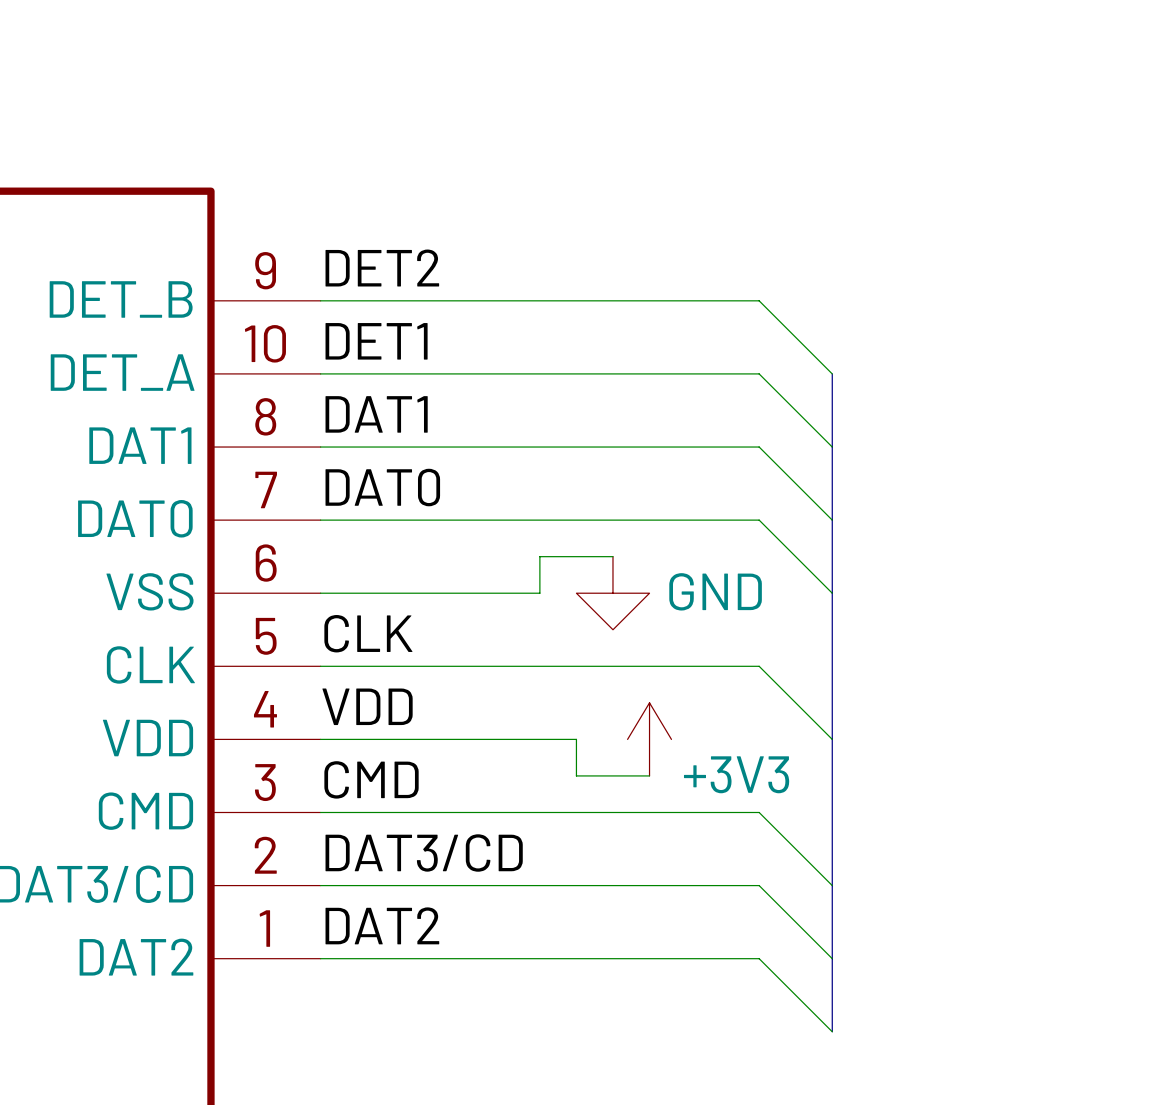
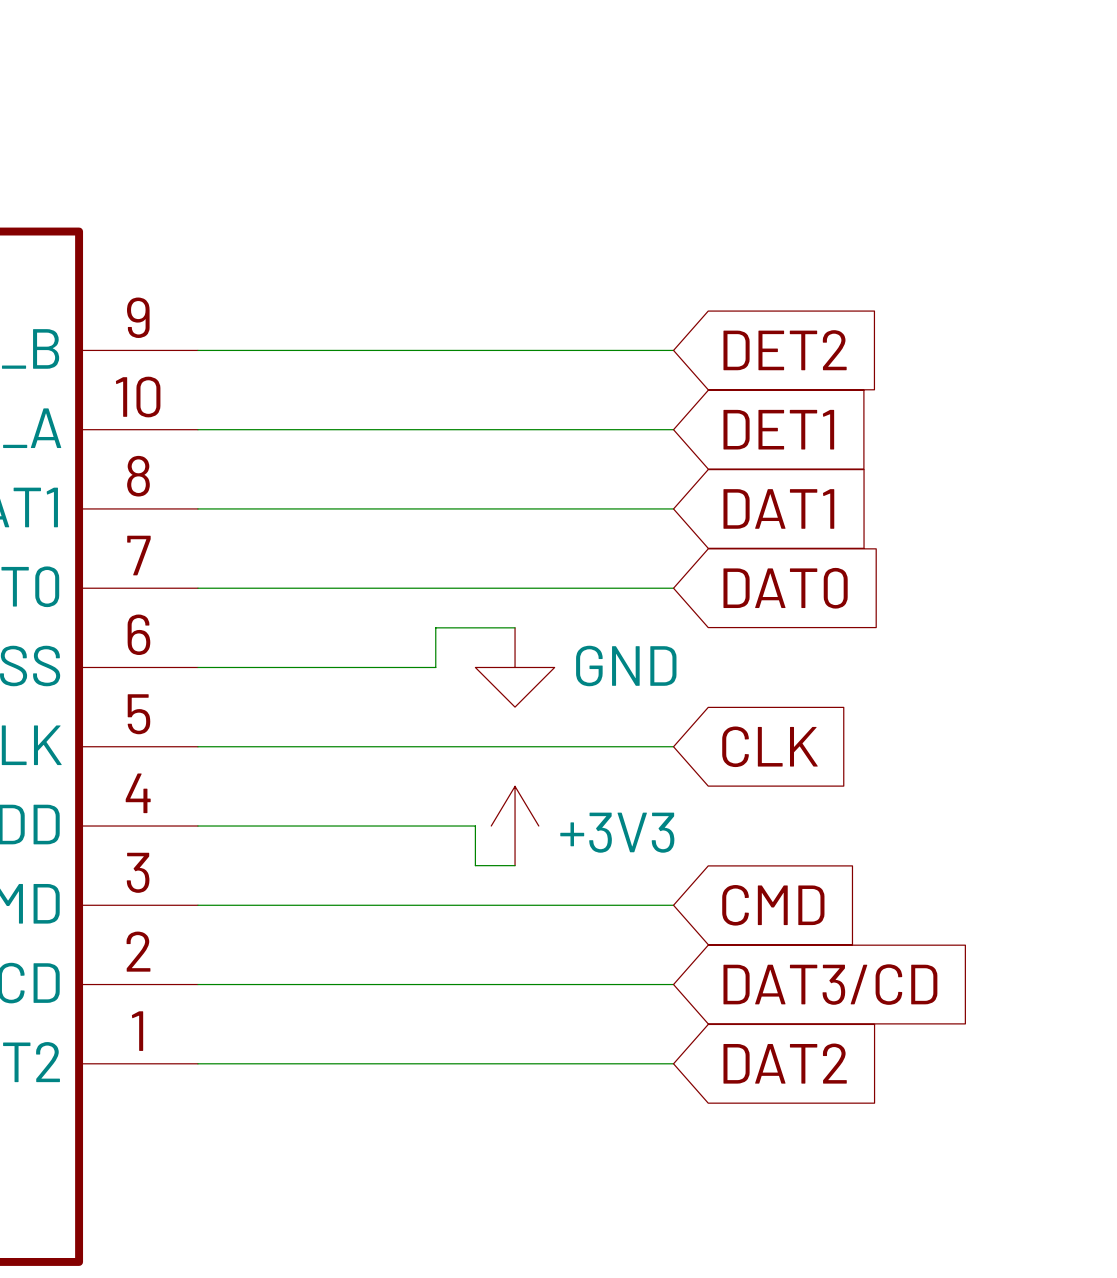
label: DET2 (382, 268) -> none
wire: (759, 300) (832, 373) -> none
global label: none -> DET2 (785, 350)
label: DET1 (376, 341) -> none
wire: (759, 373) (832, 447) -> none
bus: (832, 373) (832, 1031) -> none
global label: none -> DET1 (778, 429)
label: DAT1 (376, 414) -> none
wire: (759, 447) (832, 520) -> none
global label: none -> DAT1 (778, 508)
label: DAT0 (382, 487) -> none
wire: (759, 520) (832, 593) -> none
global label: none -> DAT0 (785, 588)
label: CLK (368, 633) -> none
wire: (759, 666) (832, 739) -> none
global label: none -> CLK (769, 746)
label: VDD (367, 706) -> none
power symbol position: +3V3 (649, 739) -> +3V3 (515, 826)
power symbol text position: +3V3 (736, 774) -> +3V3 (617, 832)
wire: (612, 775) (649, 775) -> none
label: CMD (371, 779) -> none
wire: (759, 812) (832, 885) -> none
global label: none -> CMD (773, 905)
label: DAT3/CD (424, 853) -> none
wire: (759, 885) (832, 958) -> none
global label: none -> DAT3/CD (830, 984)
label: DAT2 (382, 925) -> none
wire: (759, 958) (832, 1031) -> none
global label: none -> DAT2 (785, 1063)

